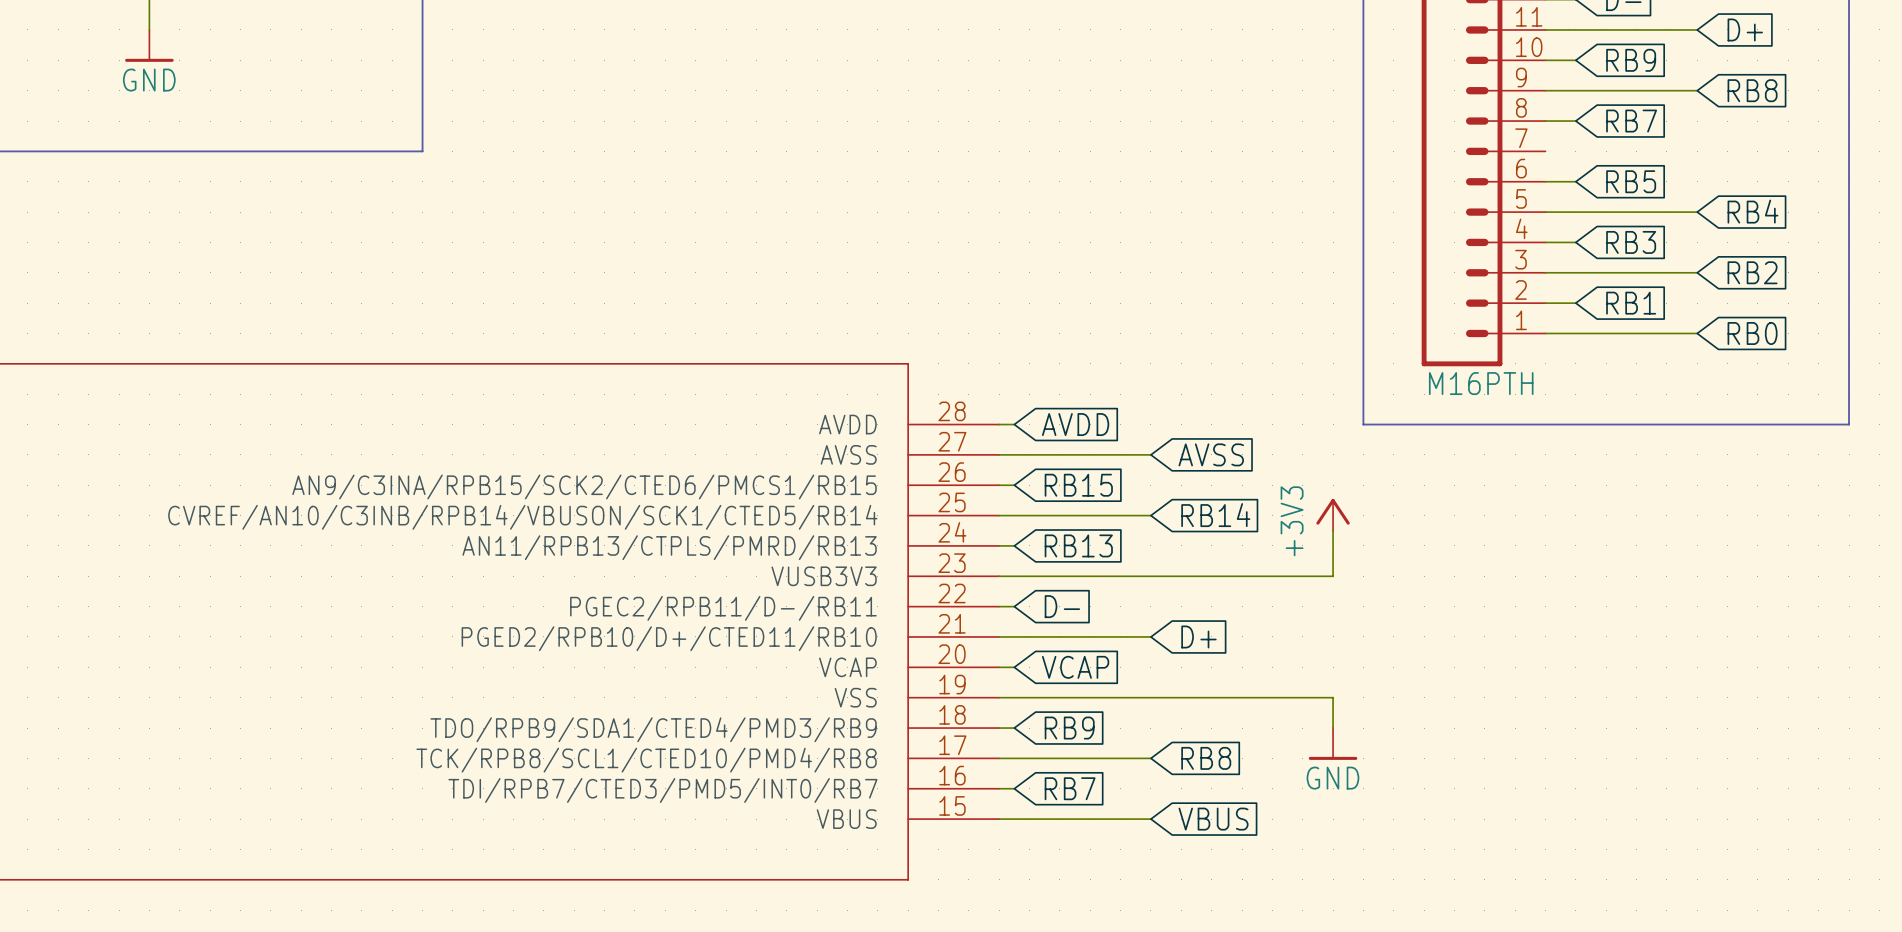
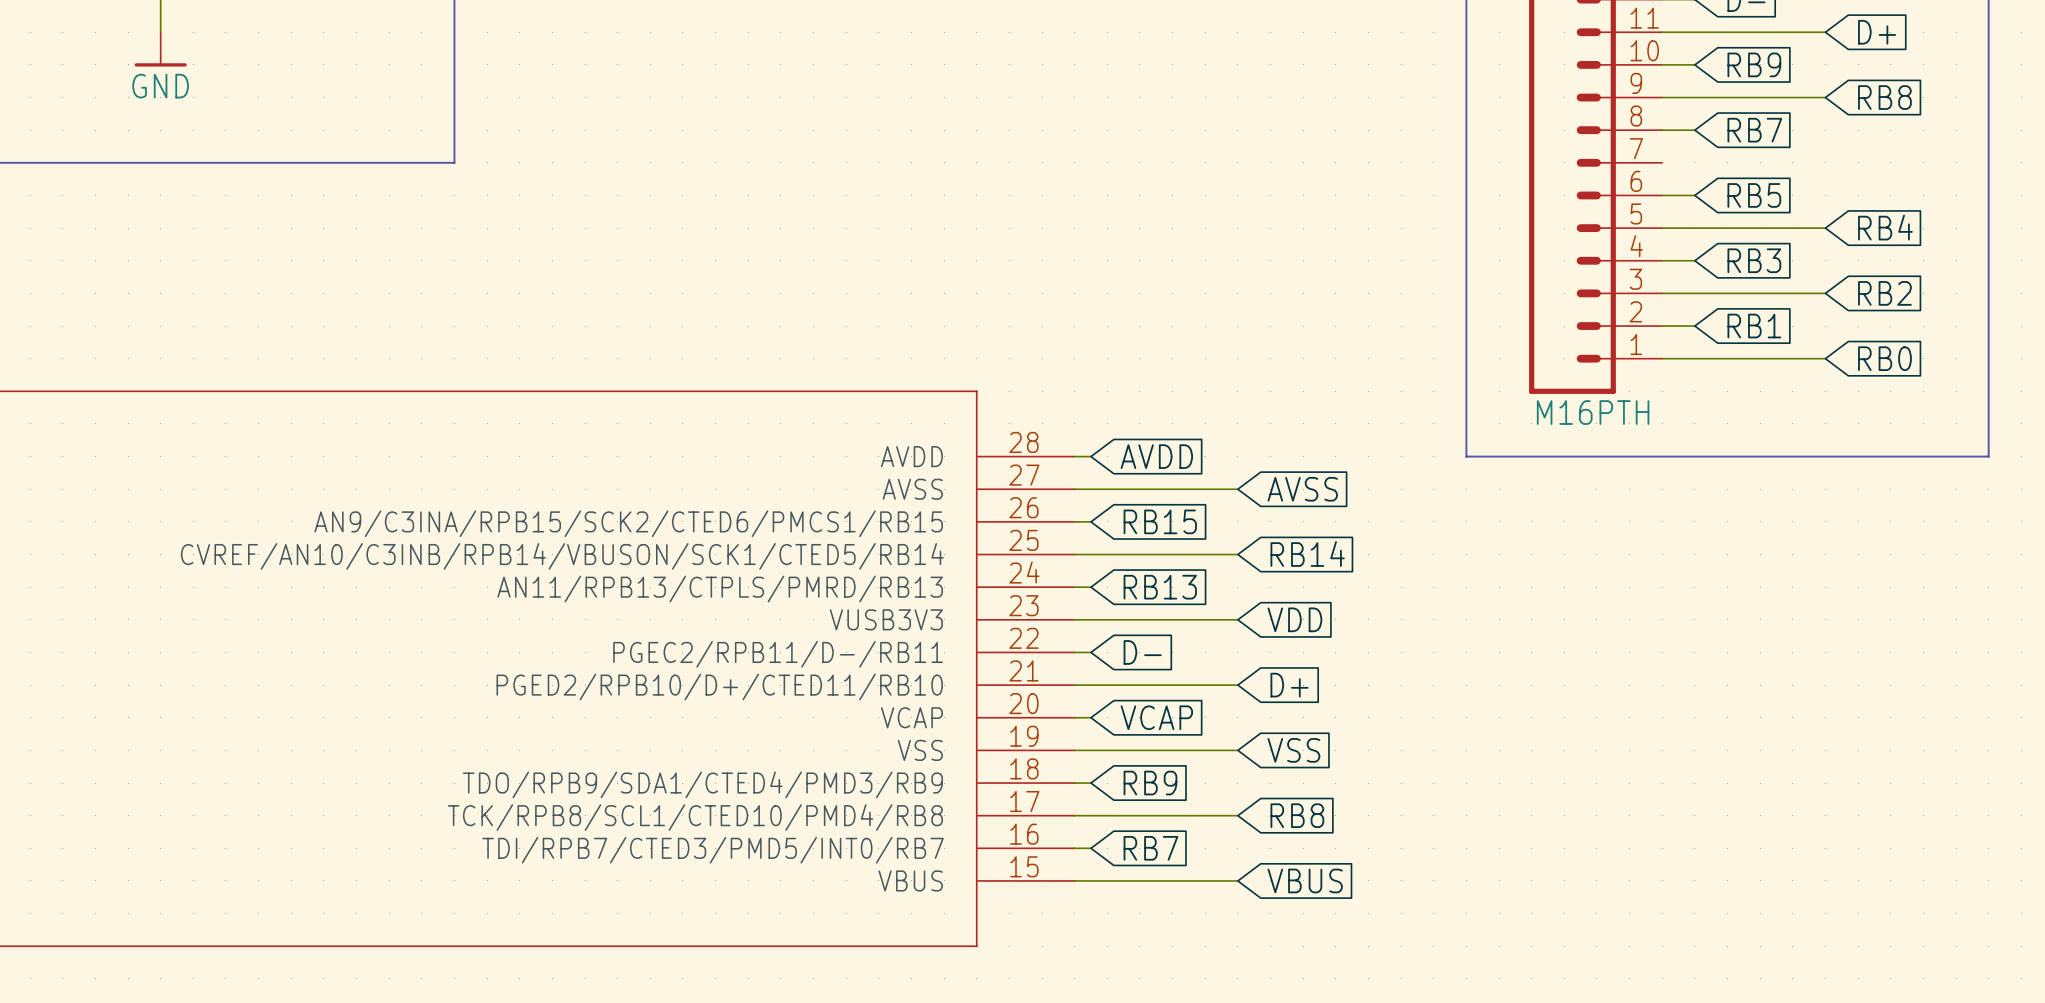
power symbol: +3V3 (1333, 514) -> none
wire: (1333, 530) (1333, 576) (1150, 576) -> none
global label: none -> VDD (1294, 619)
wire: (1150, 697) (1333, 697) (1333, 728) -> none
global label: none -> VSS (1293, 750)
power symbol: GND (1333, 743) -> none

